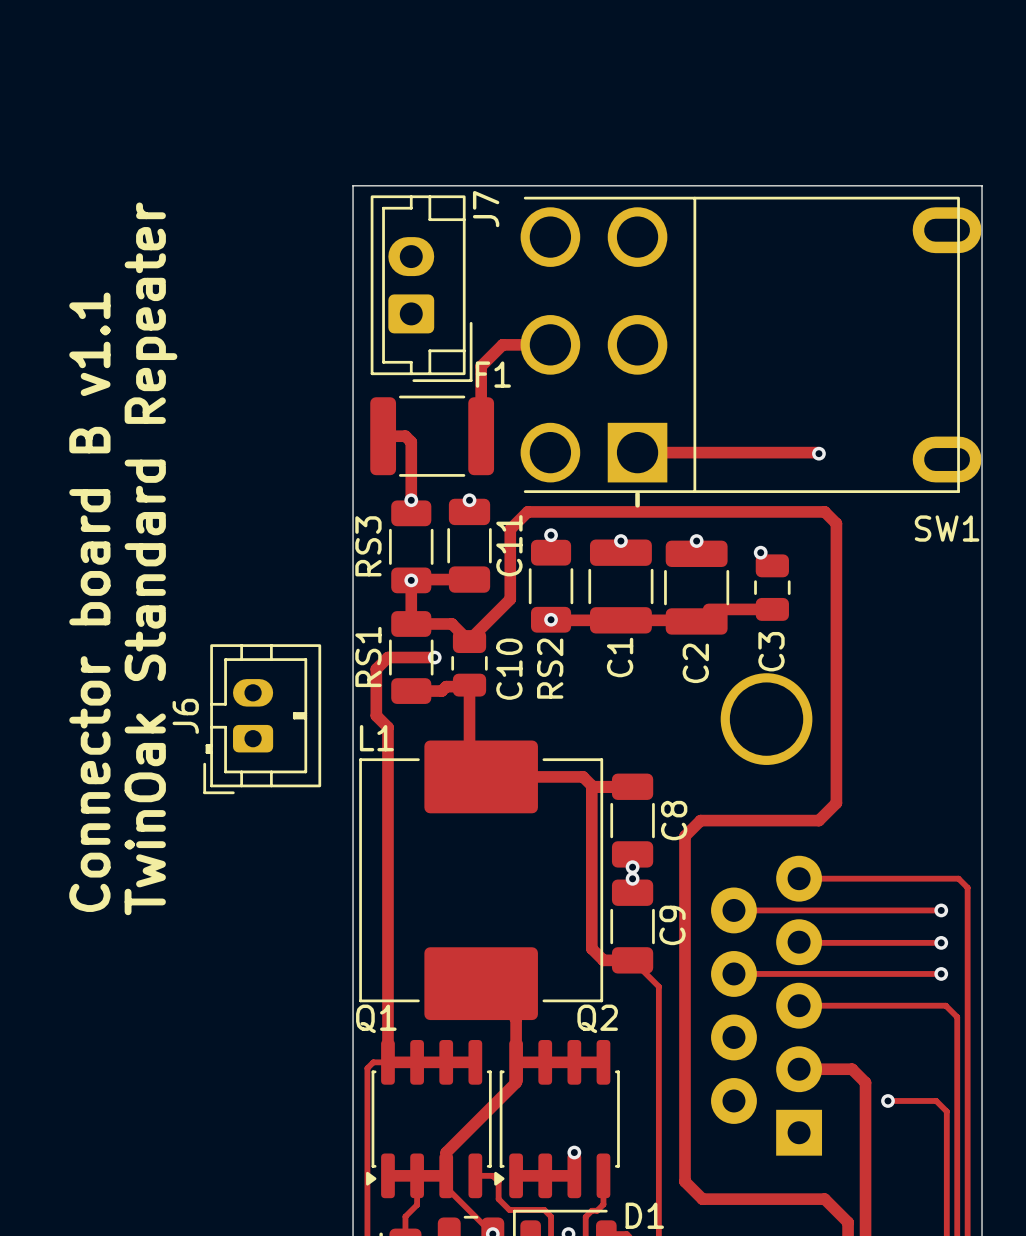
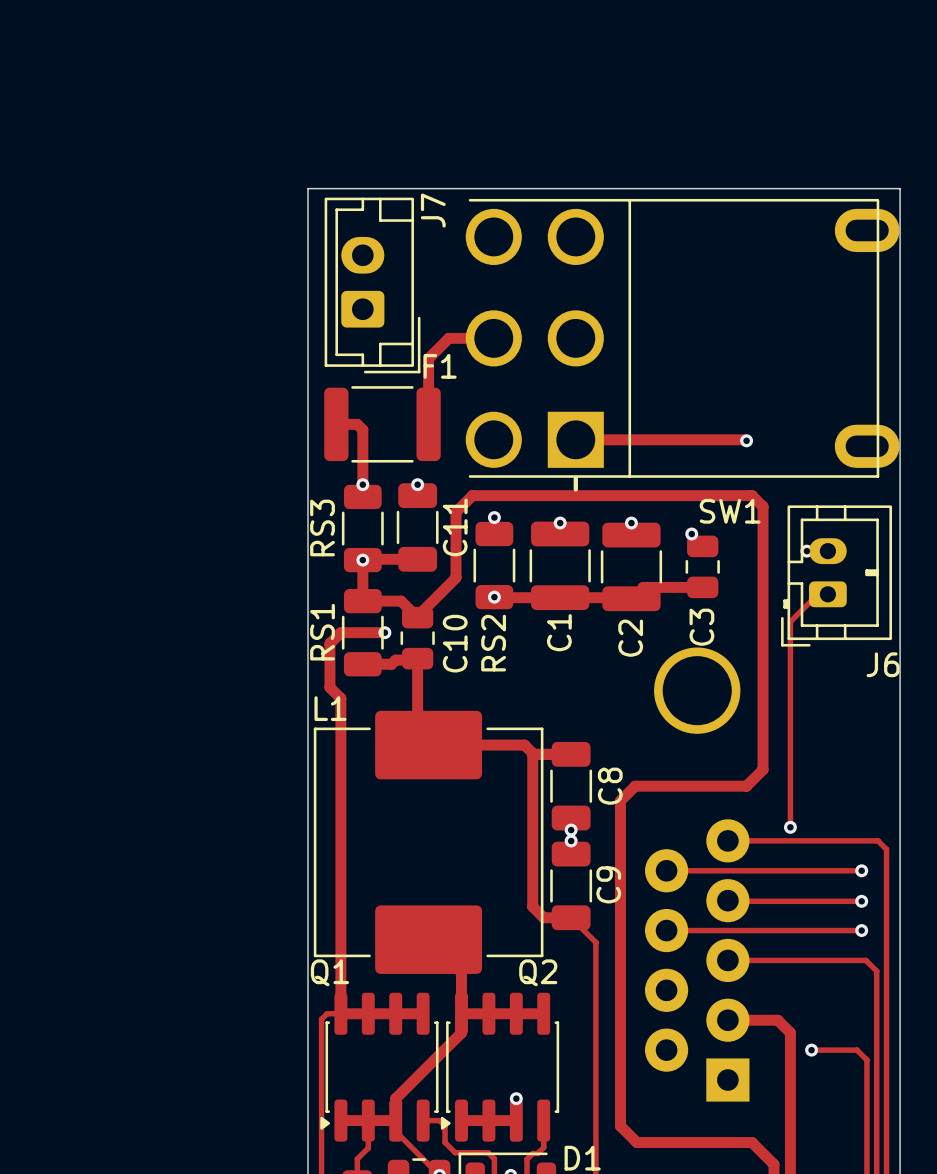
SW1 name position: SW1 (947, 528) -> SW1 (730, 511)
text: TwinOak Standard Repeater (151, 558) -> none
via: none -> (806, 551)
text: Connector board B v1.1 (89, 602) -> none
track: none -> (817, 594) (790, 621) (790, 827)
J6 name rotation: 0° (185, 716) -> 90° clockwise (883, 664)
J6 name position: J6 (185, 716) -> J6 (883, 664)
J6 position: (262, 719) -> (836, 575)
via: none -> (790, 827)

